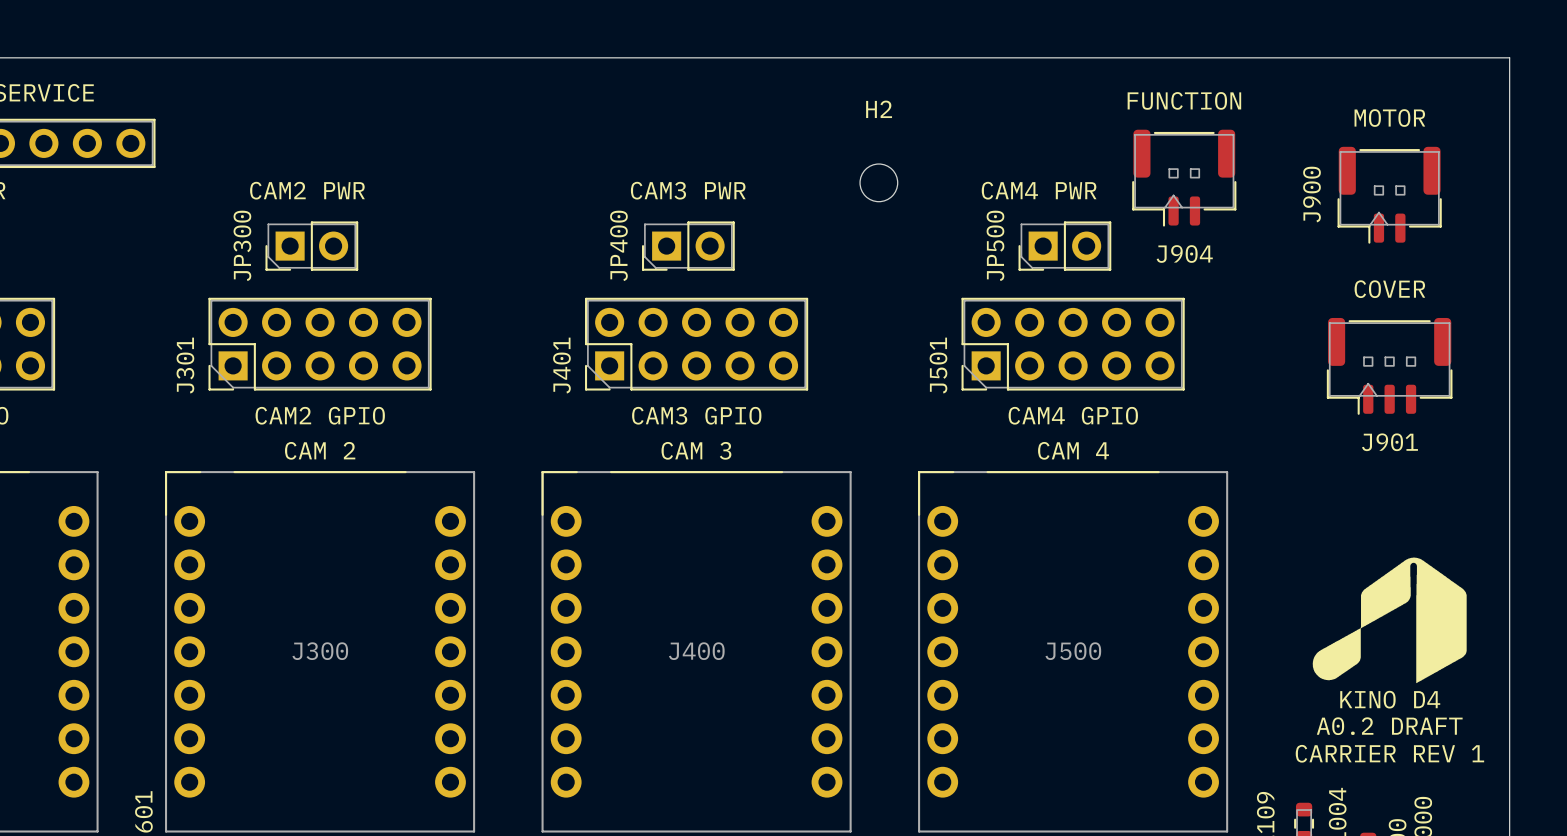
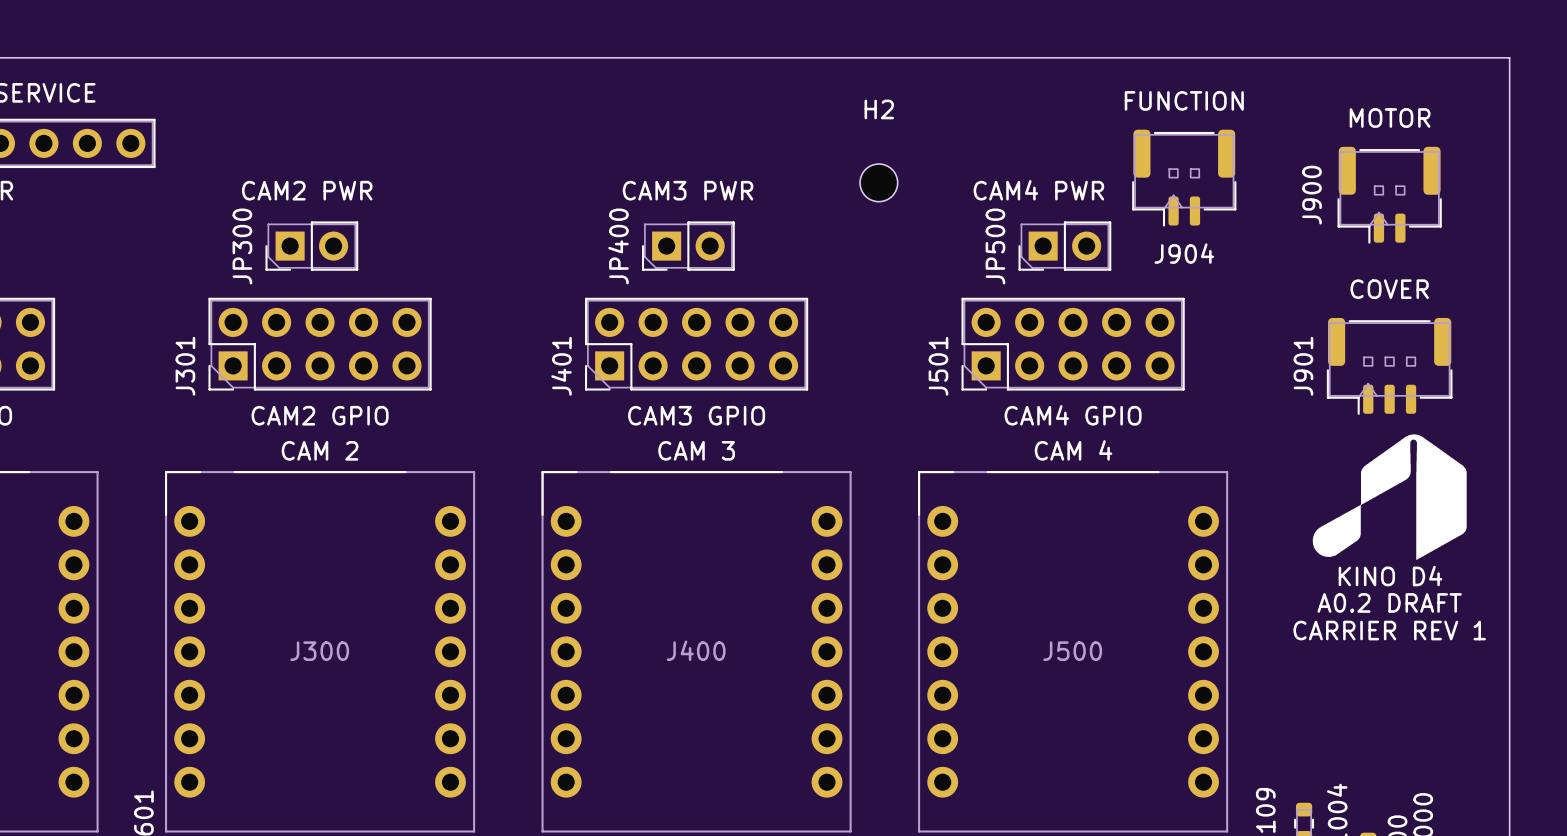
J901 name rotation: 0° (1389, 442) -> 90° counterclockwise (1303, 366)
J901 name position: J901 (1389, 442) -> J901 (1303, 366)
drawing position: (1389, 620) -> (1389, 497)
text position: KINO D4 (1390, 699) -> KINO D4 (1390, 576)
text position: A0.2 DRAFT (1389, 726) -> A0.2 DRAFT (1389, 602)
text position: CARRIER REV 1 (1389, 753) -> CARRIER REV 1 (1389, 630)

